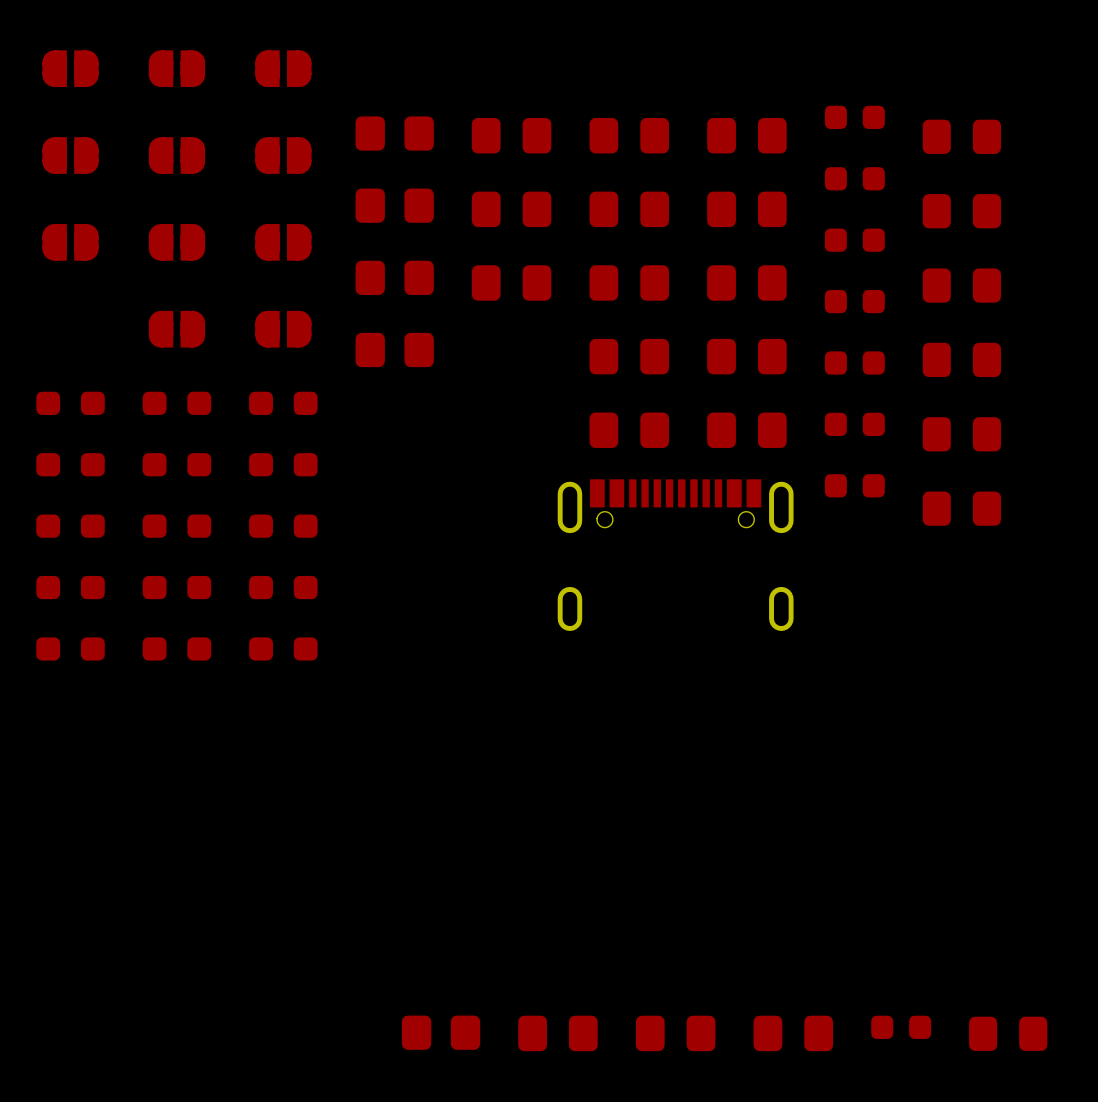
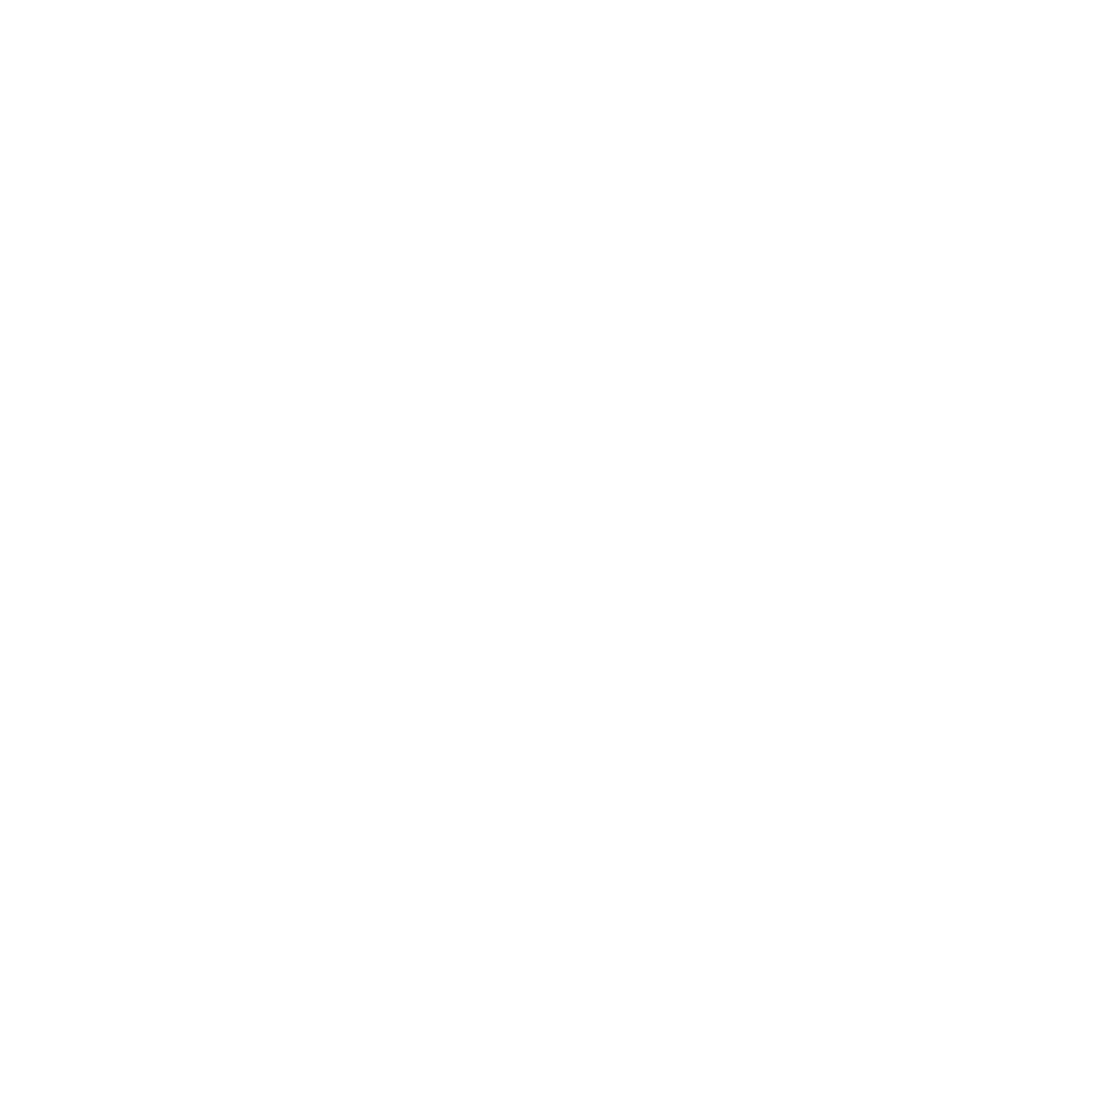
part: (70, 68) -> none
part: (176, 68) -> none
part: (283, 68) -> none
part: (854, 117) -> none
part: (394, 133) -> none
part: (511, 135) -> none
part: (629, 135) -> none
part: (746, 135) -> none
part: (961, 136) -> none
part: (70, 155) -> none
part: (176, 155) -> none
part: (283, 155) -> none
part: (854, 178) -> none
part: (394, 205) -> none
part: (511, 209) -> none
part: (629, 209) -> none
part: (746, 209) -> none
part: (961, 211) -> none
part: (854, 240) -> none
part: (70, 242) -> none
part: (176, 242) -> none
part: (283, 242) -> none
part: (394, 277) -> none
part: (511, 282) -> none
part: (629, 282) -> none
part: (746, 282) -> none
part: (961, 285) -> none
part: (854, 301) -> none
part: (176, 329) -> none
part: (283, 329) -> none
part: (394, 350) -> none
part: (629, 356) -> none
part: (746, 356) -> none
part: (961, 359) -> none
part: (854, 362) -> none
part: (70, 403) -> none
part: (176, 403) -> none
part: (283, 403) -> none
part: (854, 424) -> none
part: (629, 430) -> none
part: (746, 430) -> none
part: (961, 434) -> none
part: (70, 464) -> none
part: (176, 464) -> none
part: (283, 464) -> none
part: (854, 485) -> none
part: (961, 508) -> none
part: (70, 526) -> none
part: (176, 526) -> none
part: (283, 526) -> none
part: (675, 555) -> none
part: (70, 587) -> none
part: (176, 587) -> none
part: (283, 587) -> none
part: (70, 648) -> none
part: (176, 648) -> none
part: (283, 648) -> none
part: (901, 1027) -> none
part: (441, 1032) -> none
part: (557, 1033) -> none
part: (675, 1033) -> none
part: (793, 1033) -> none
part: (1008, 1033) -> none

